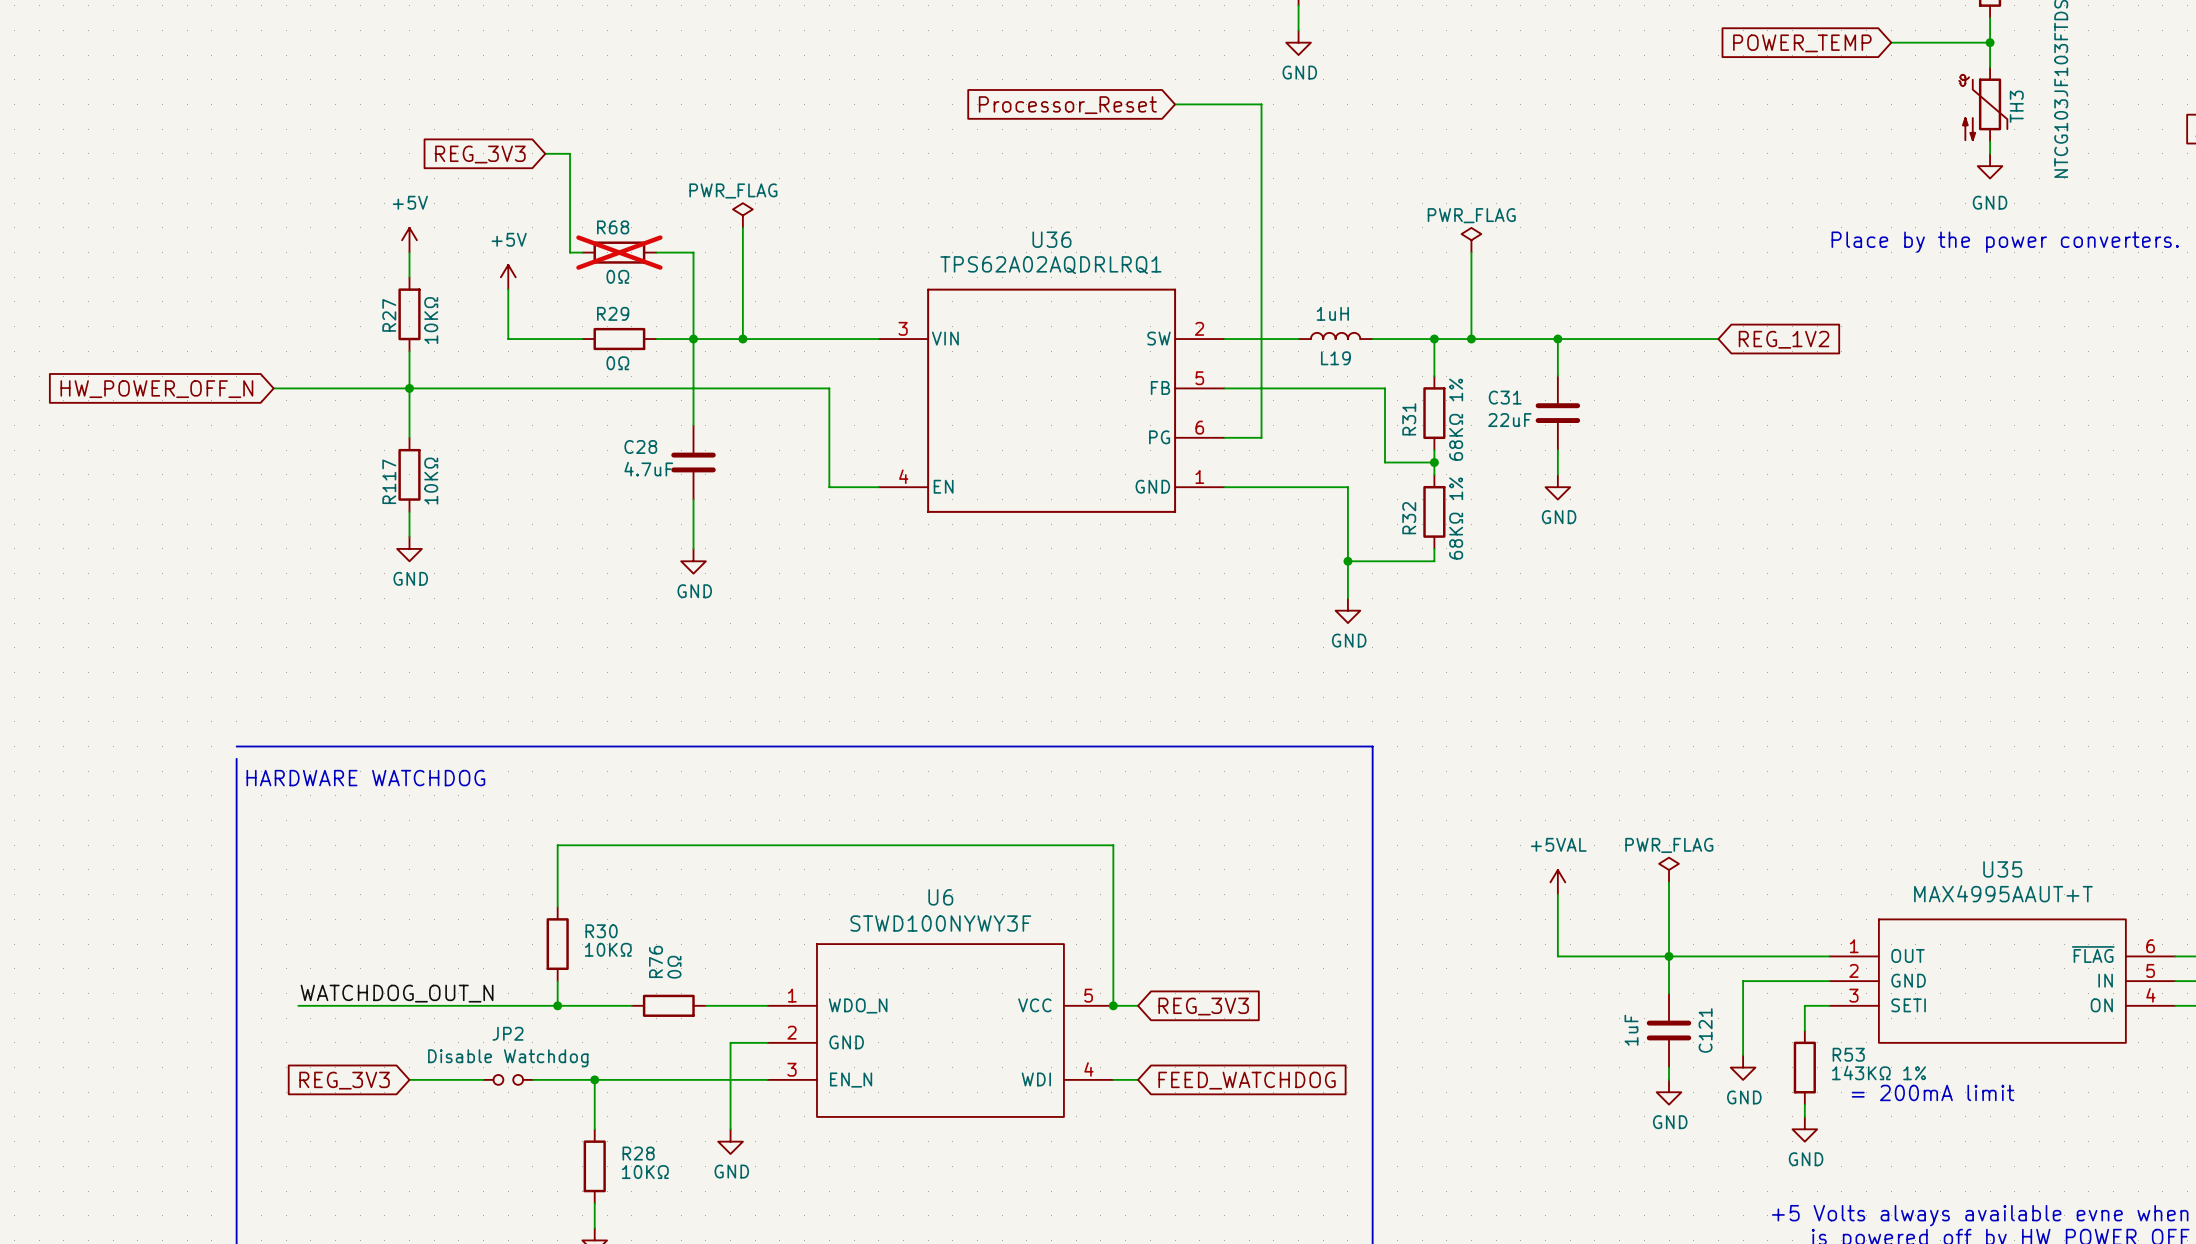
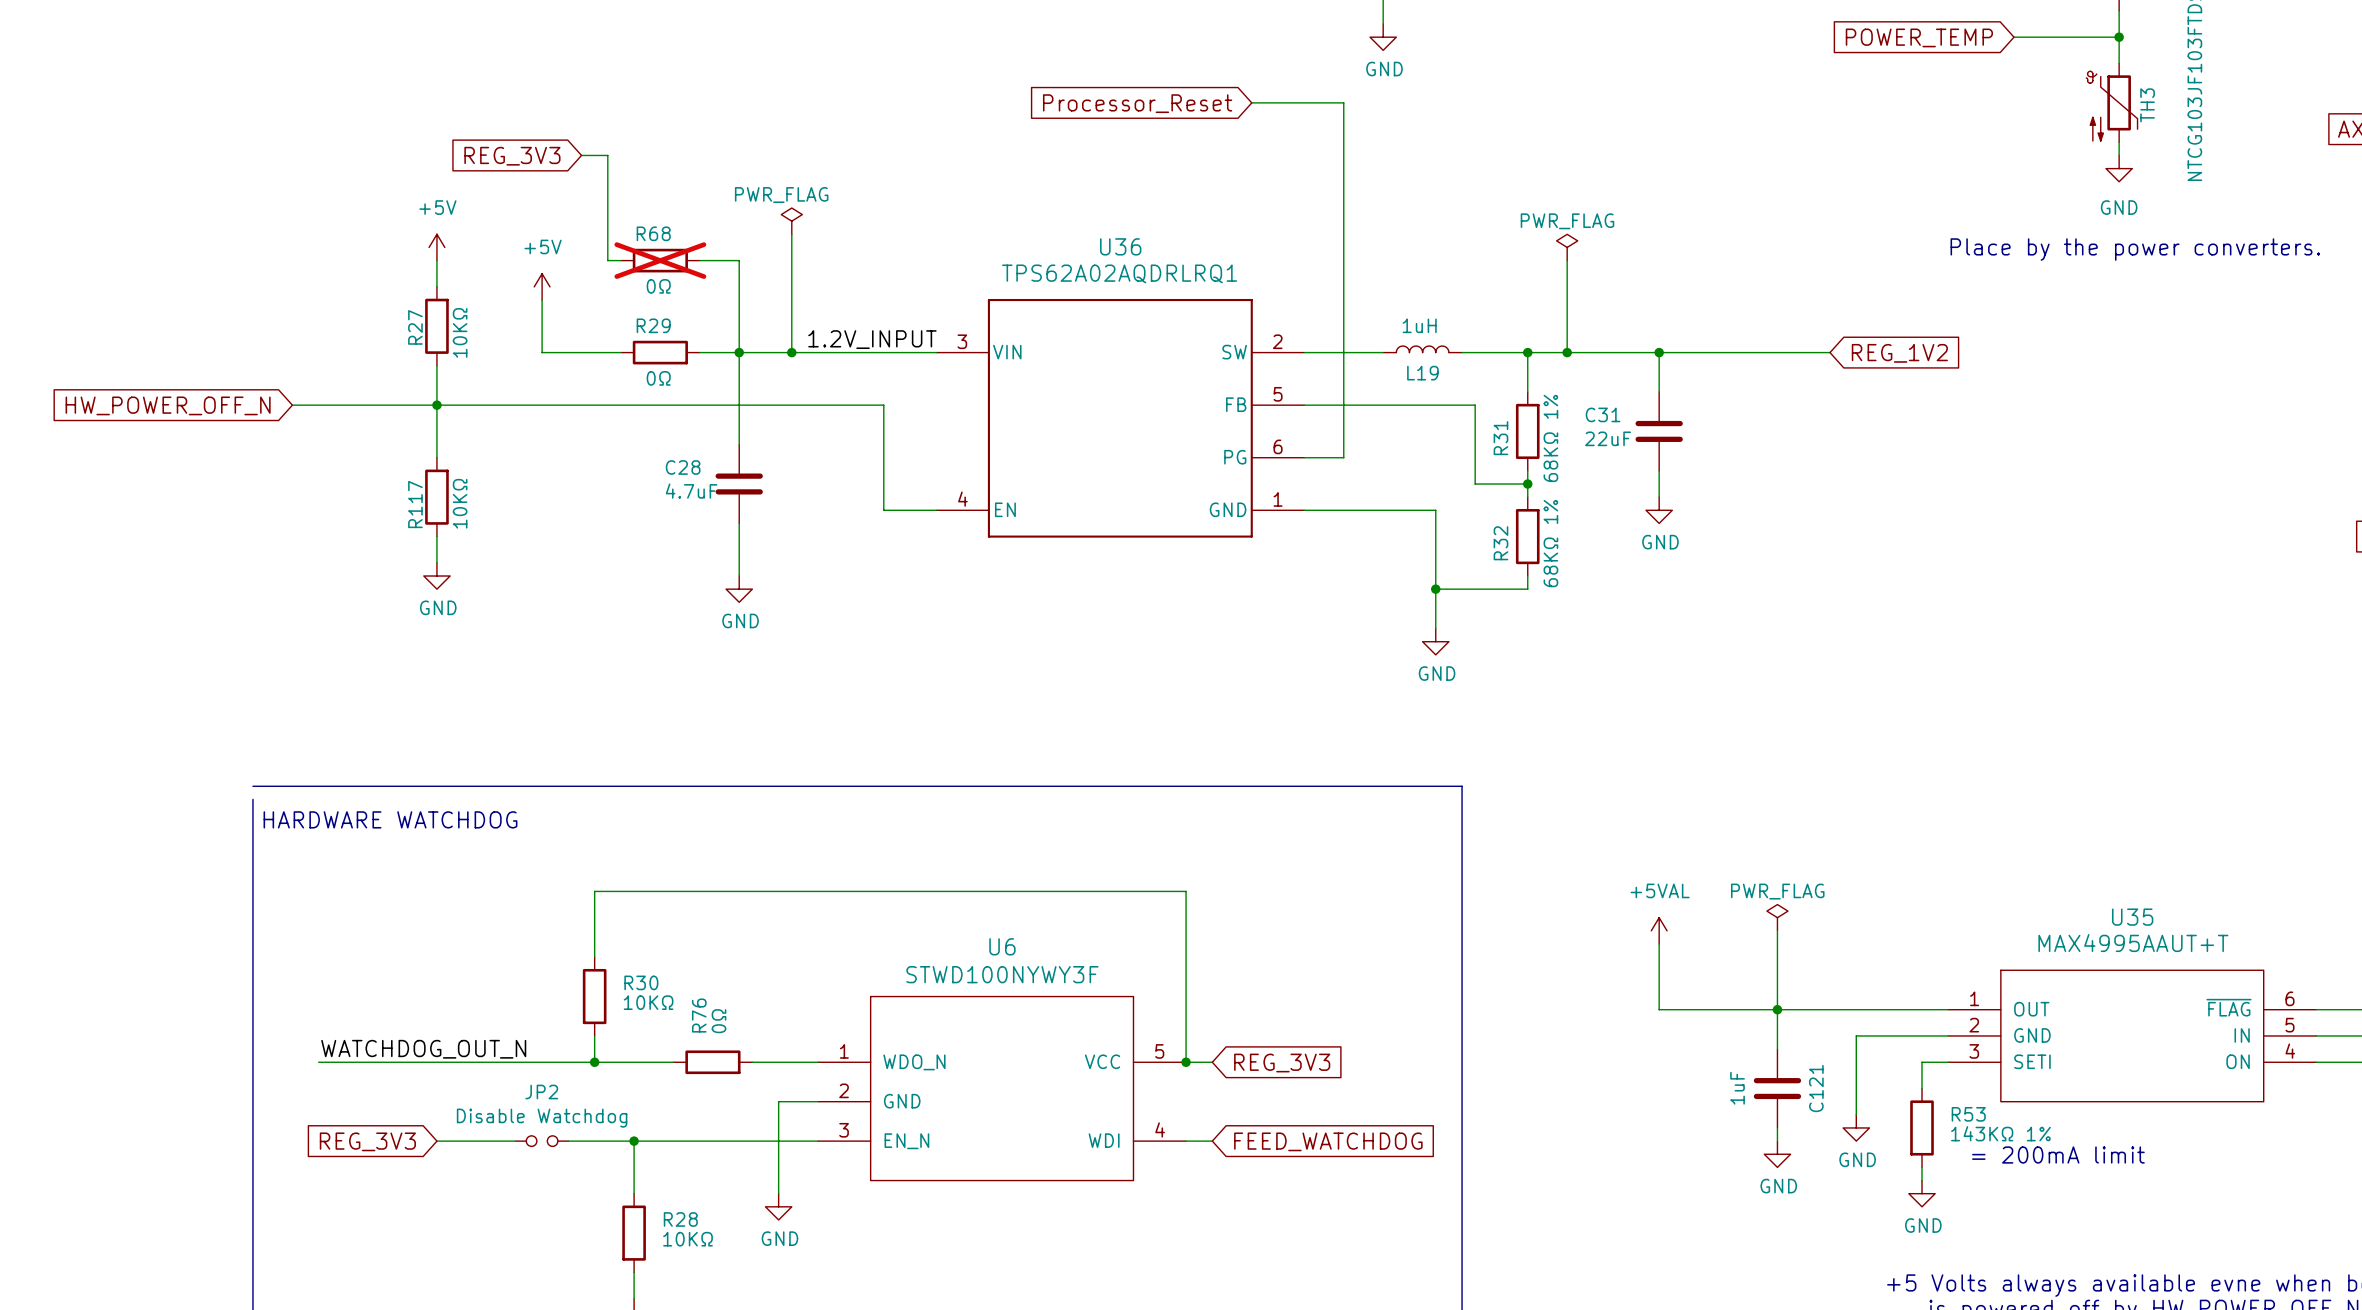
label: none -> 1.2V_INPUT (872, 339)

